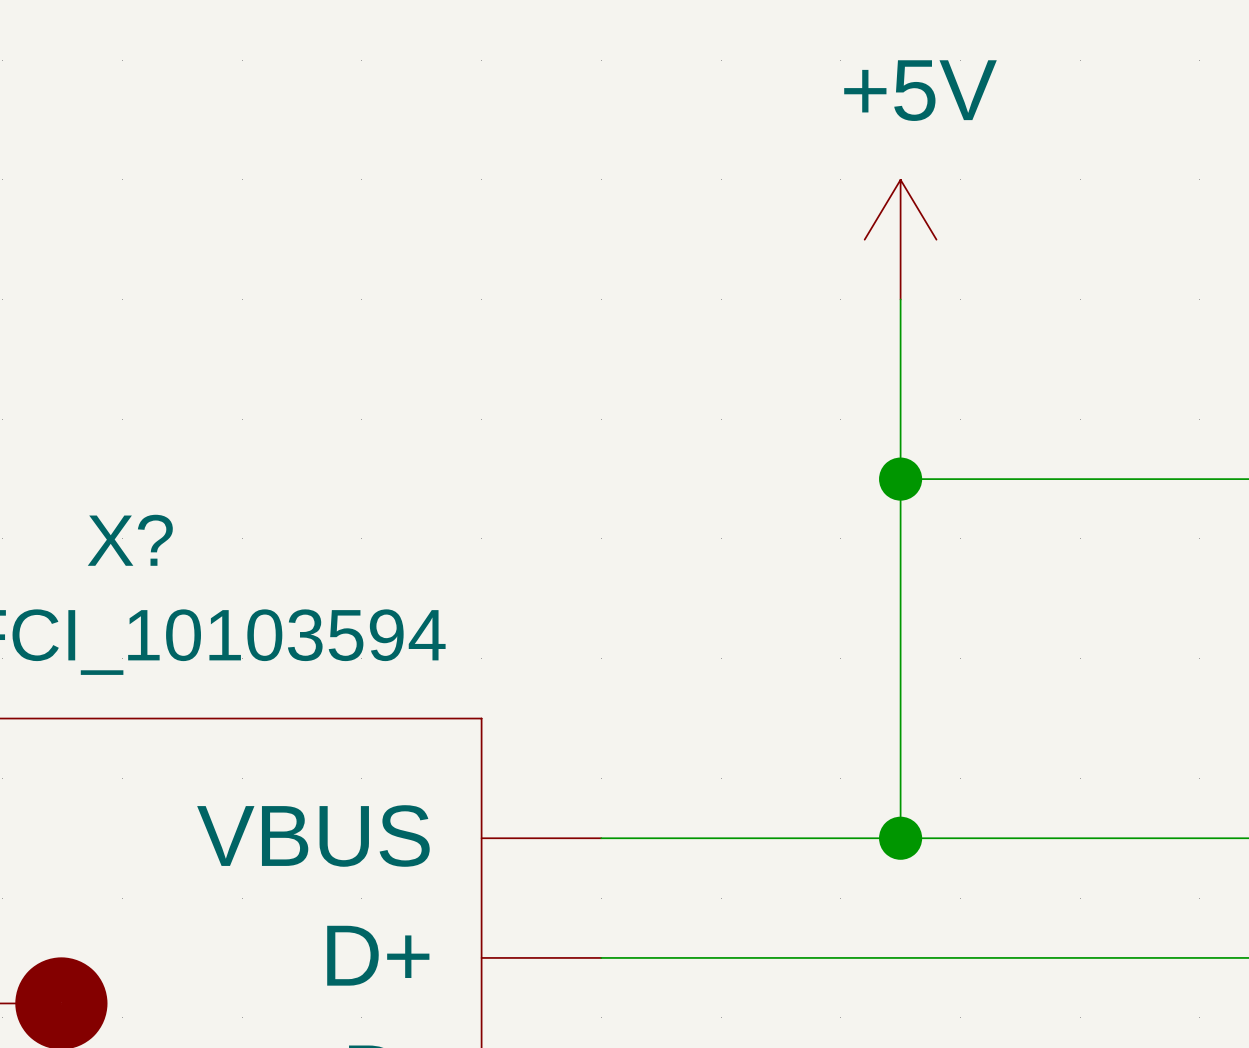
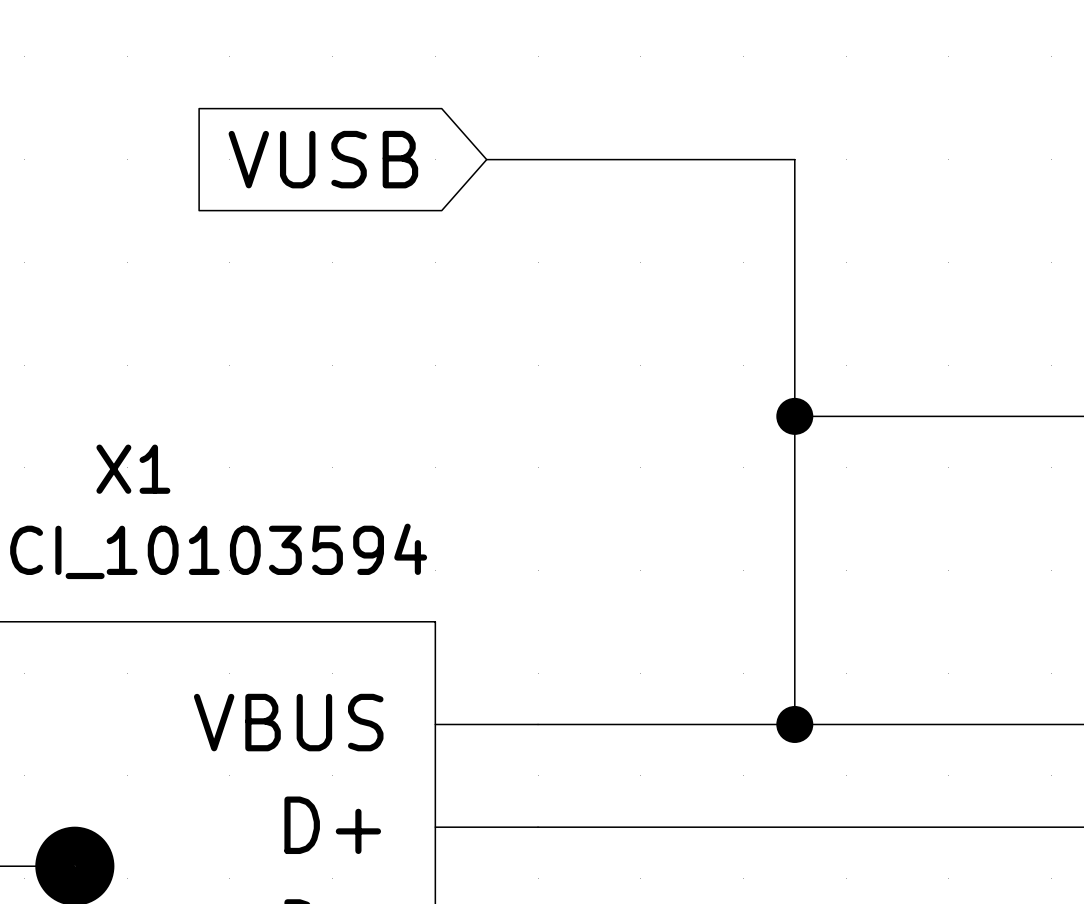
global label: none -> VUSB (323, 159)
wire: none -> (486, 159) (794, 159) (794, 262)
power symbol: +5V (900, 239) -> none
X? name: X? (130, 540) -> X1 (133, 469)

